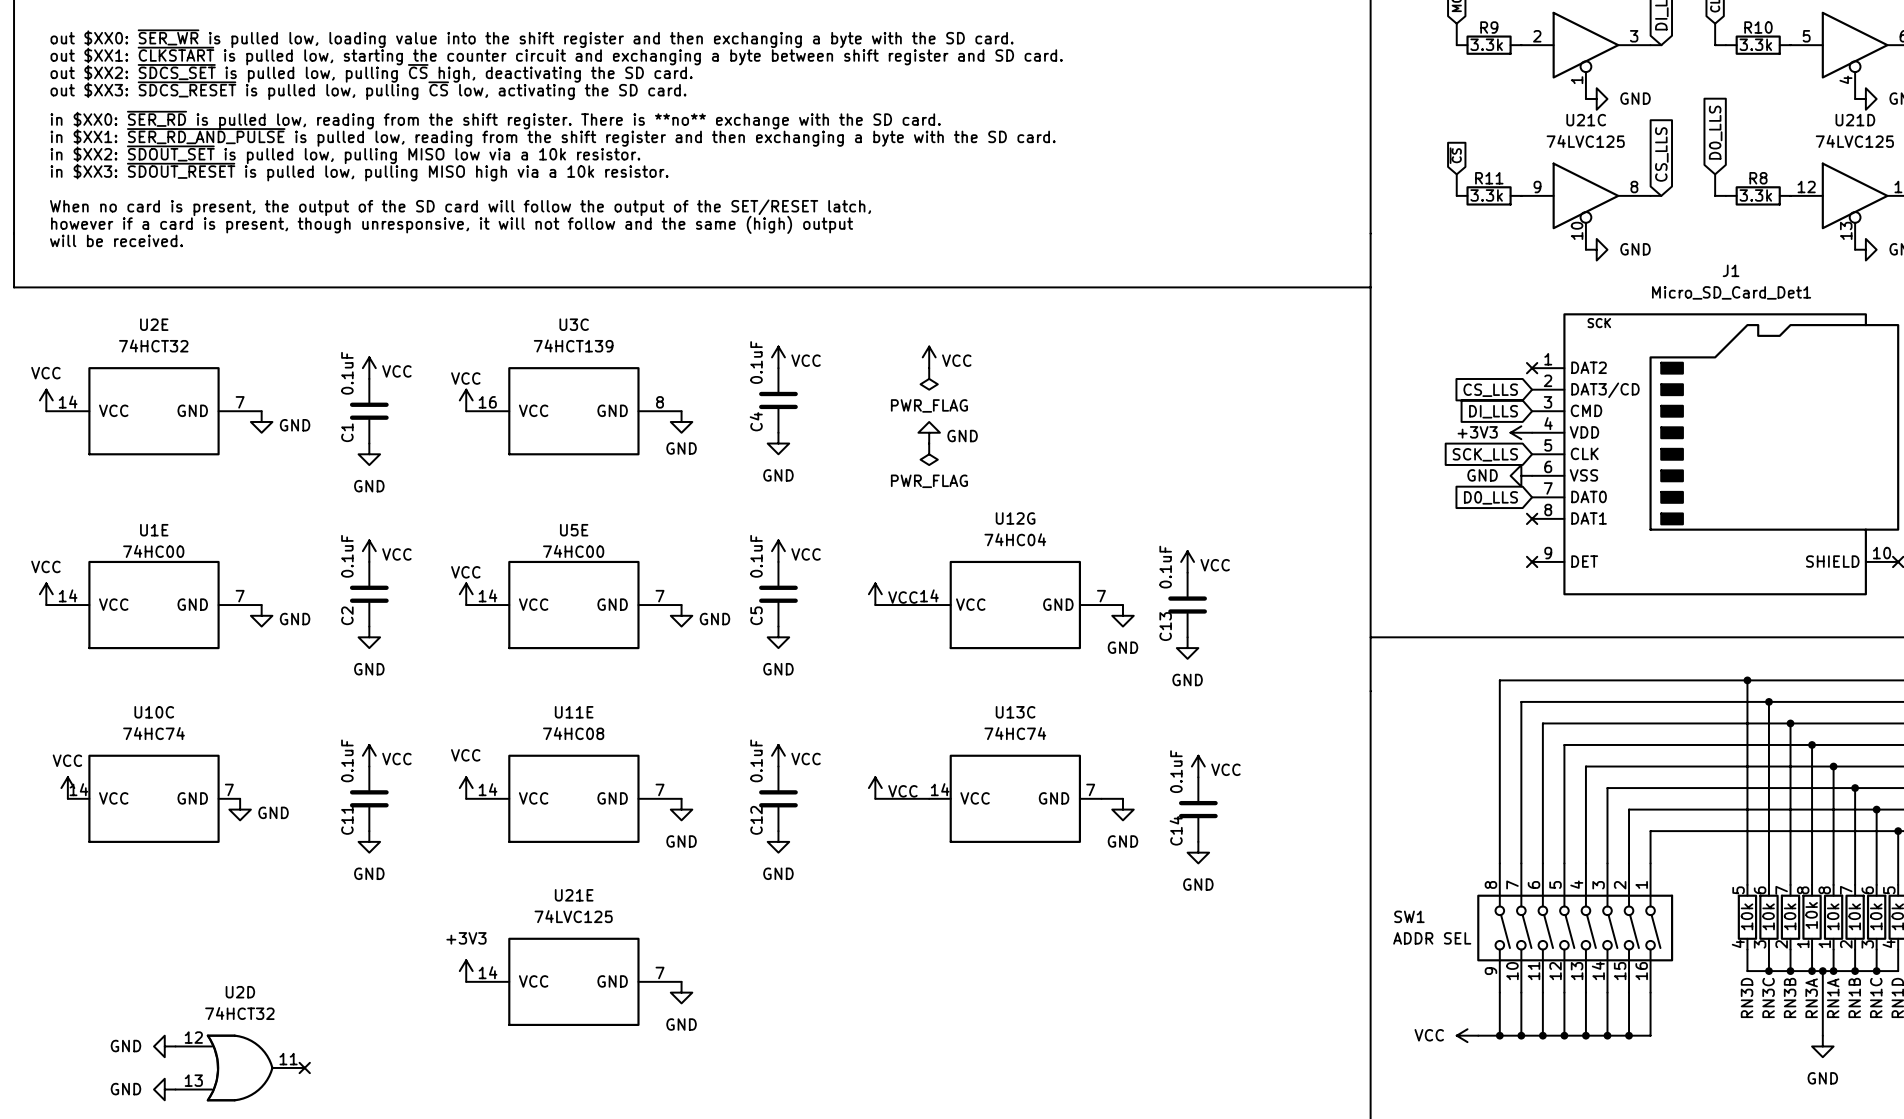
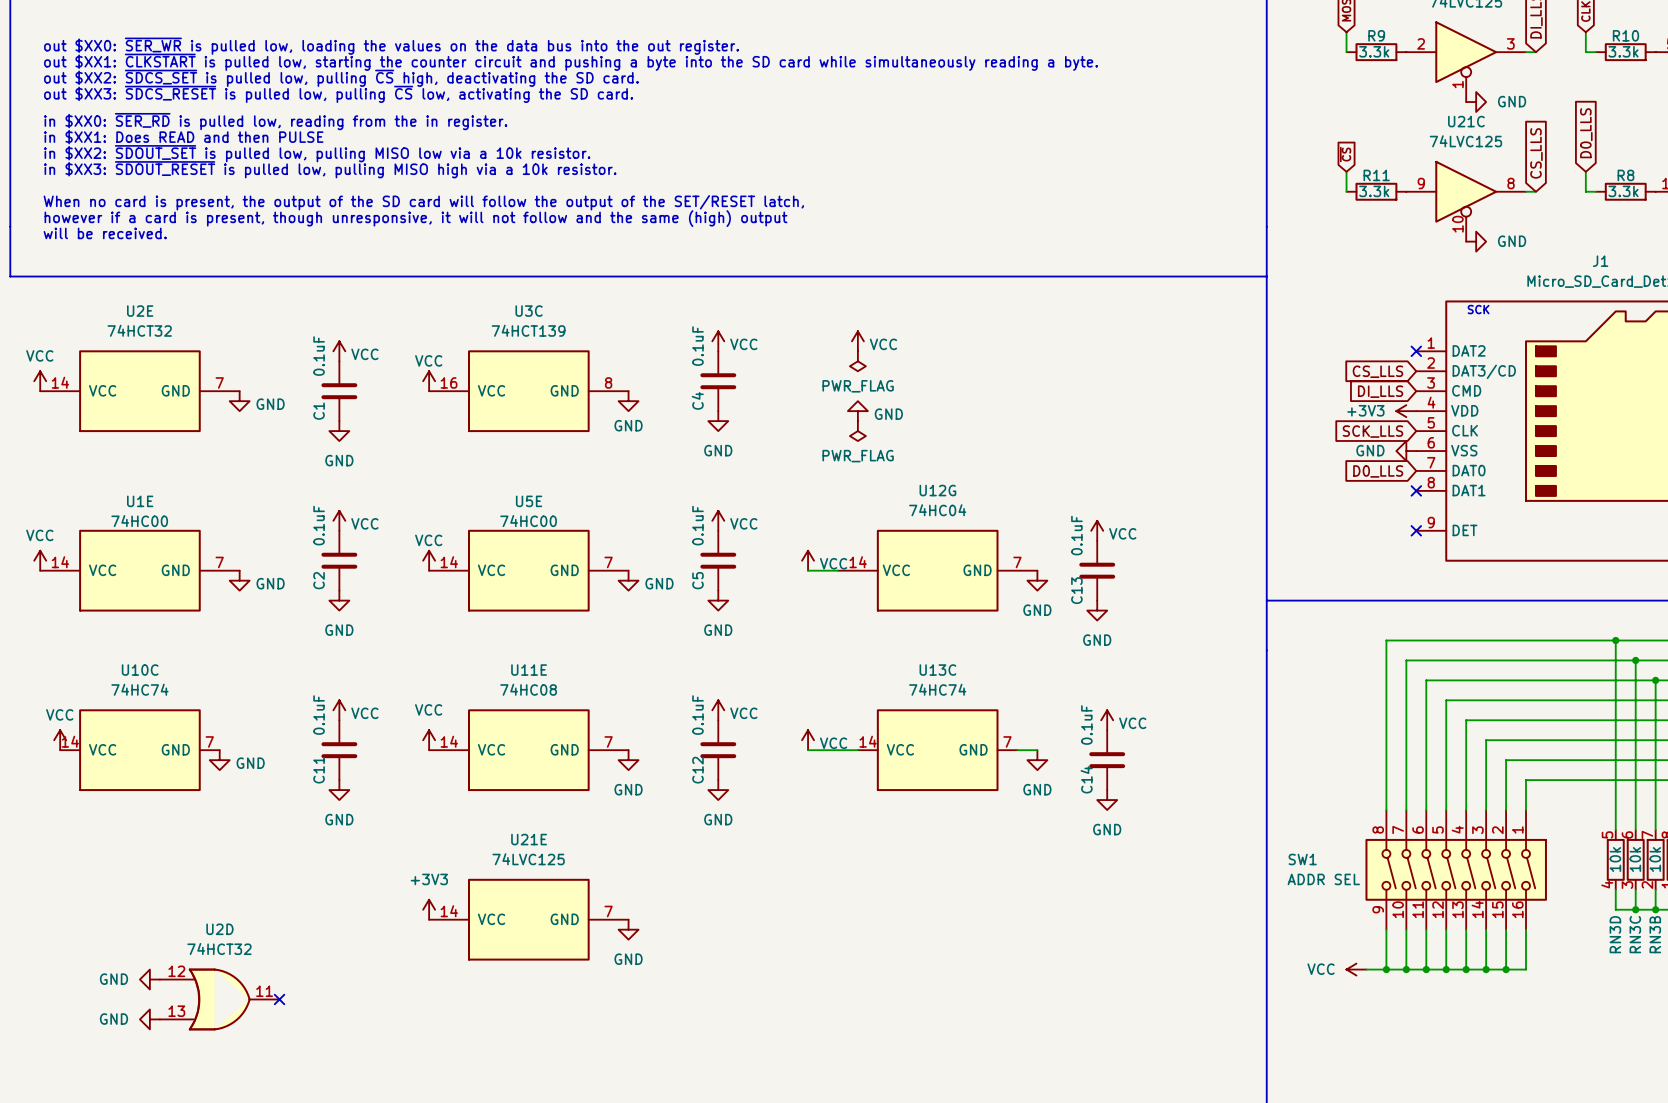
text: out $XX0: ~{SER_WR} is pulled low, loading value into the shift register and then exchanging a byte with the SD card. (532, 38) -> out $XX0: ~{SER_WR} is pulled low, loading the values on the data bus into the out register. (391, 46)
text: out $XX1: ~{CLKSTART} is pulled low, starting the counter circuit and exchanging a byte between shift register and SD card. (556, 56) -> out $XX1: ~{CLKSTART} is pulled low, starting the counter circuit and pushing a byte into the SD card while simultaneously reading a byte. (571, 62)
text: in $XX0: ~{SER_RD} is pulled low, reading from the shift register. There is **no** exchange with the SD card. (495, 120) -> in $XX0: ~{SER_RD} is pulled low, reading from the in register. (275, 121)
text: in $XX1: ~{SER_RD_AND_PULSE} is pulled low, reading from the shift register and then exchanging a byte with the SD card. (553, 137) -> in $XX1: Does READ and then PULSE (183, 137)

